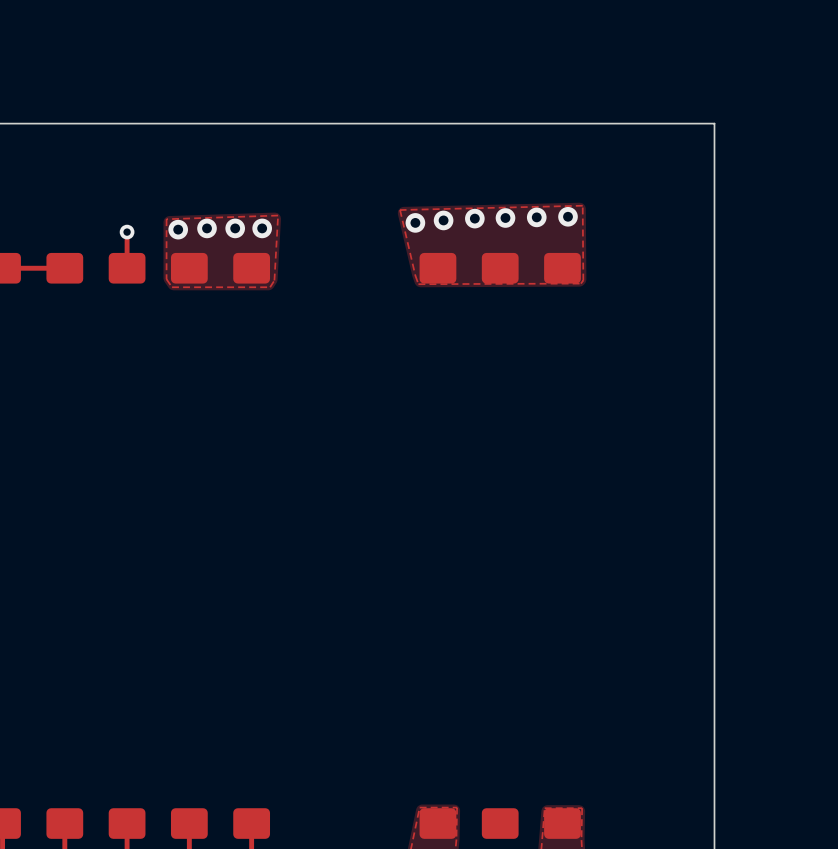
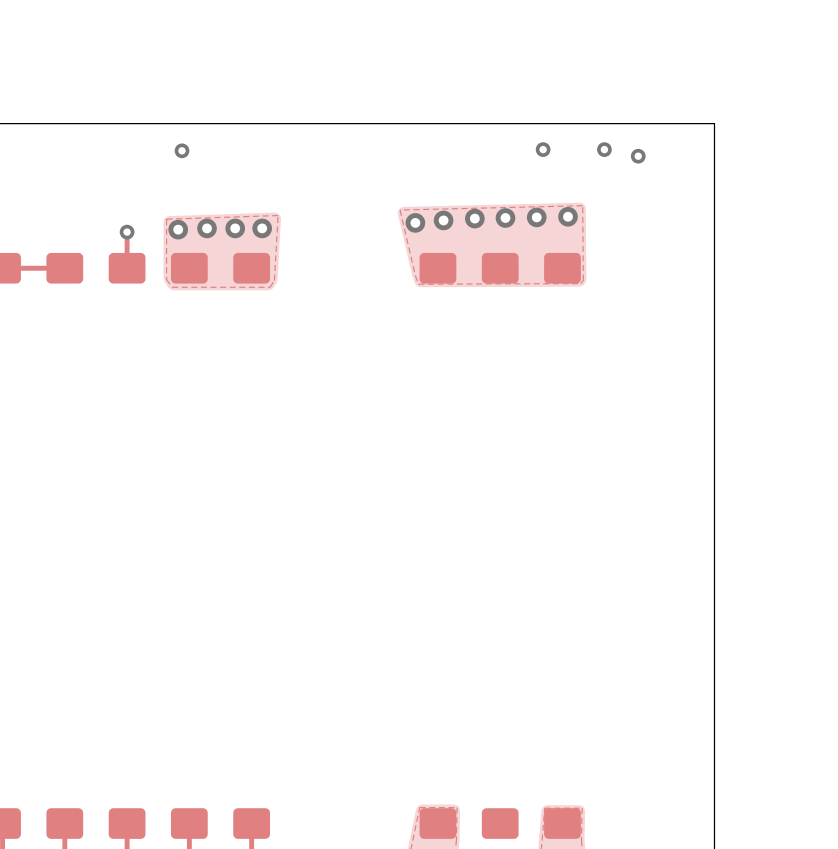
via: none -> (543, 149)
via: none -> (604, 149)
via: none -> (182, 150)
via: none -> (638, 156)

